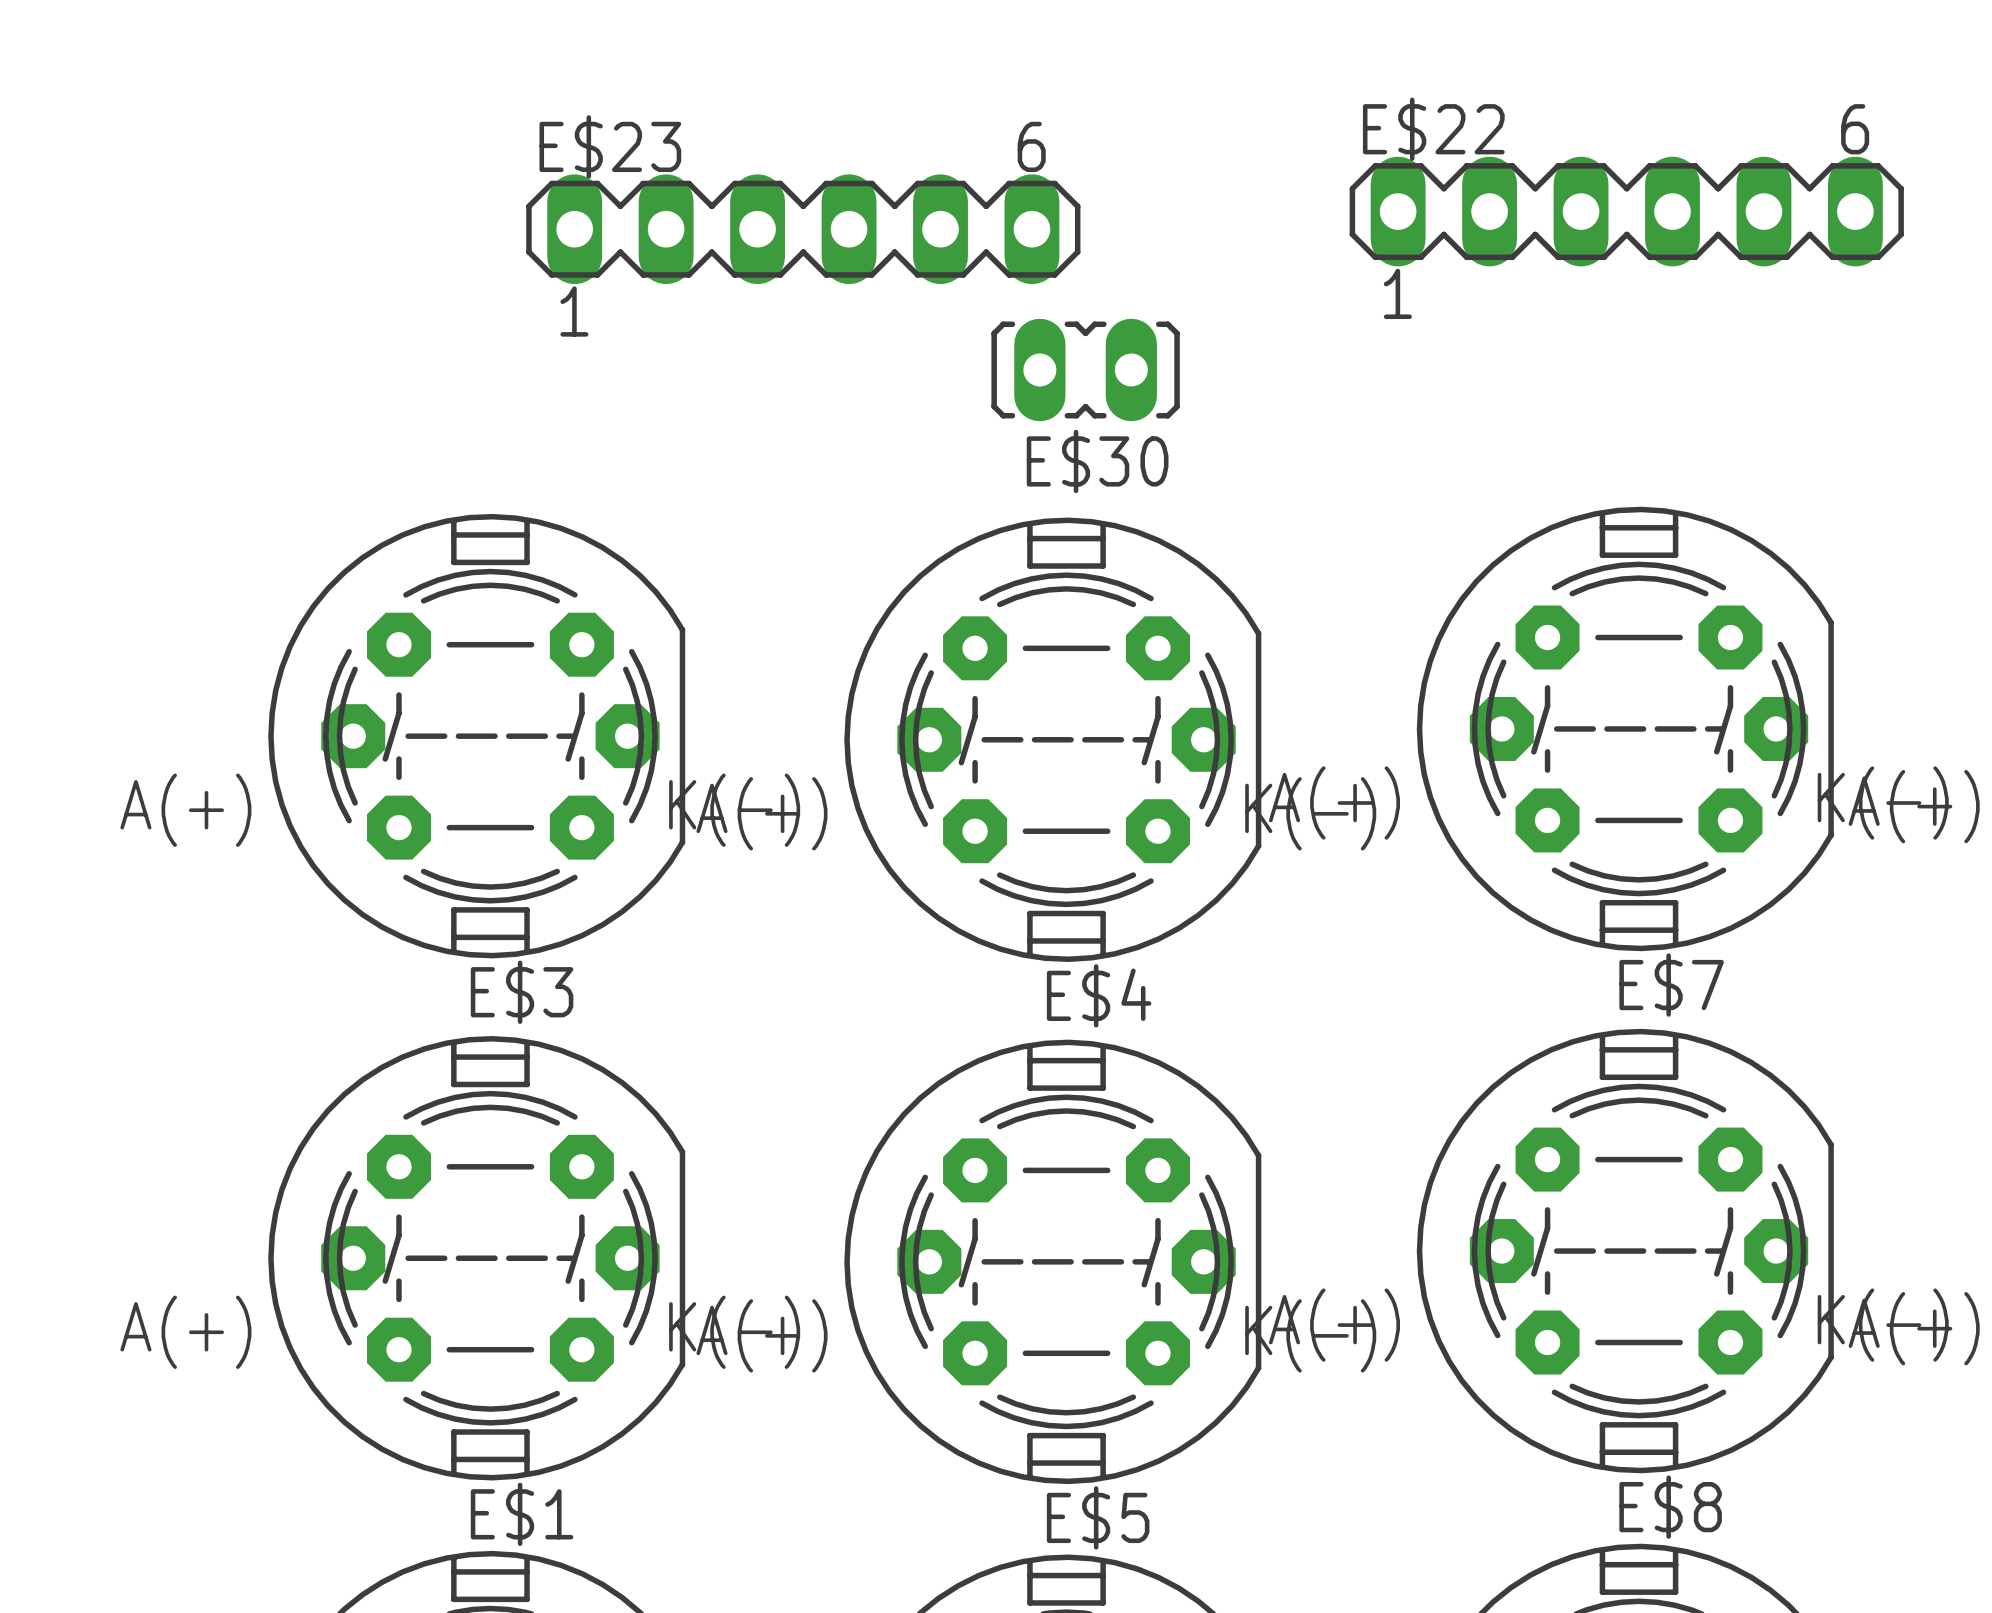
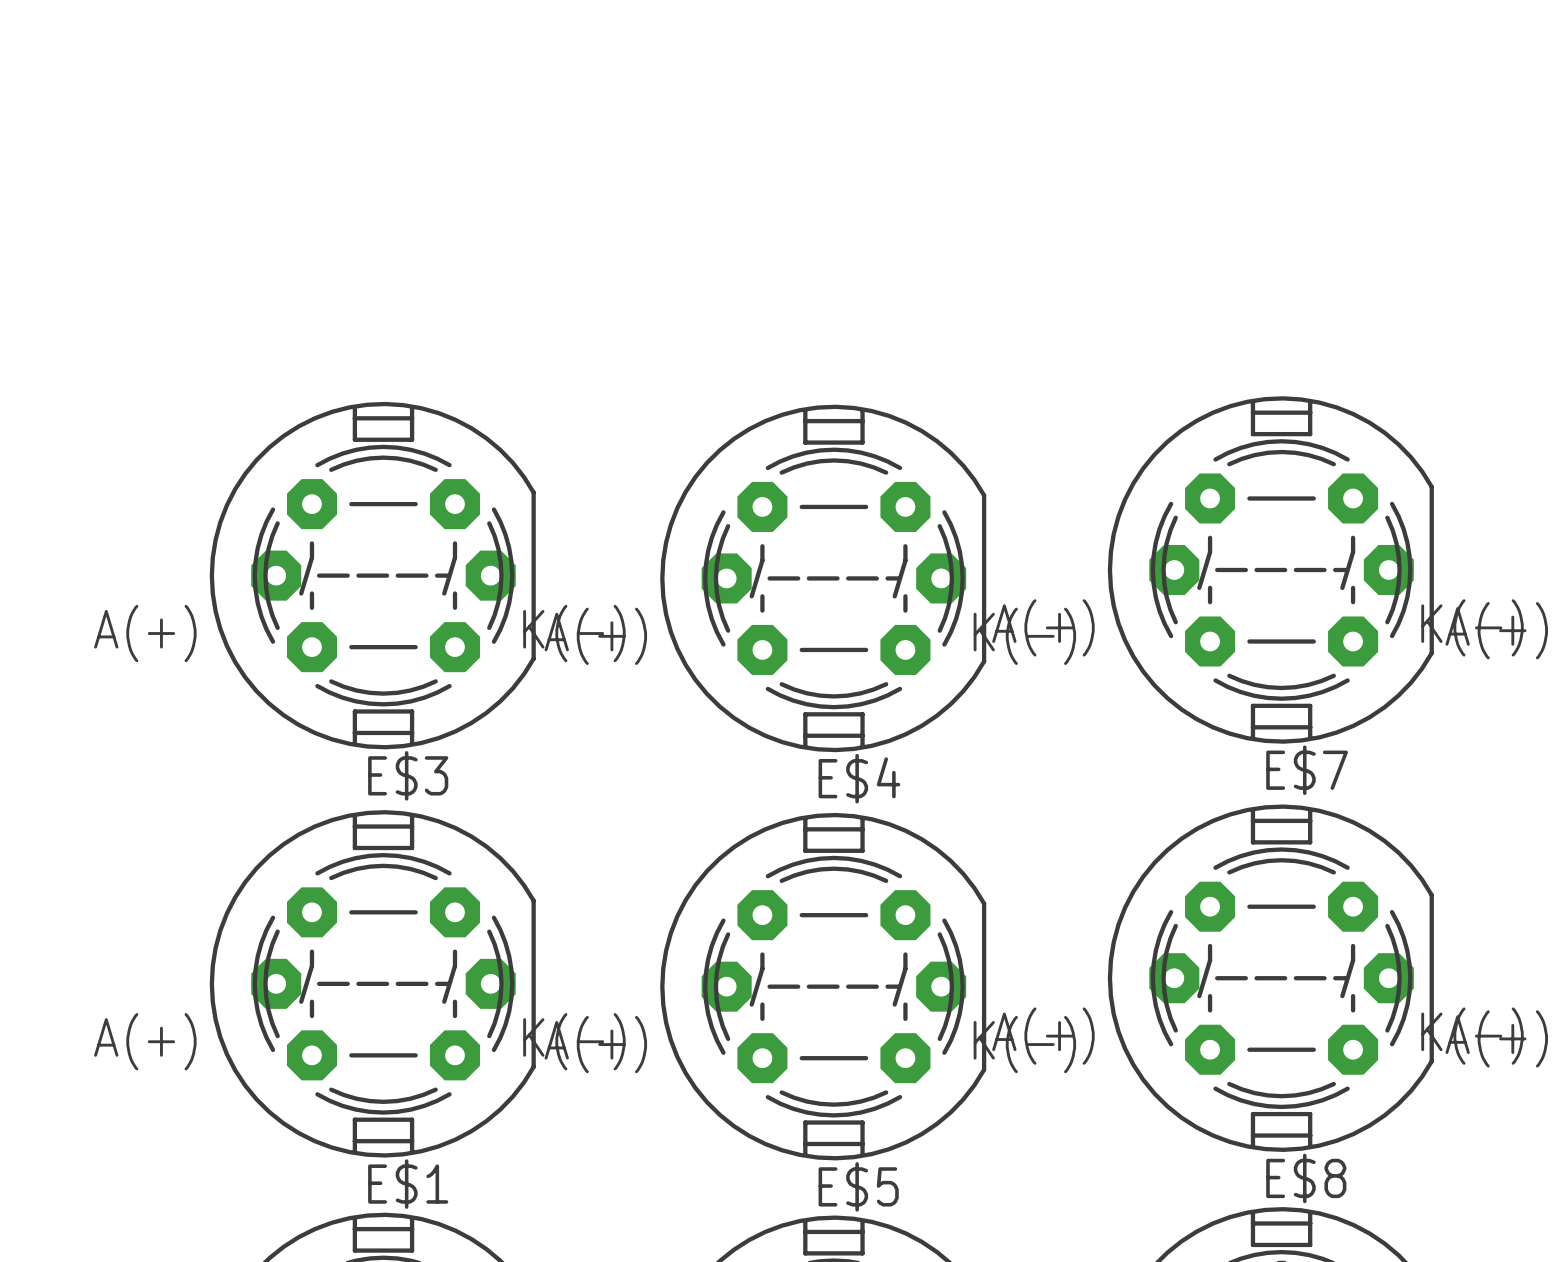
E$22: (1626, 211) -> none
E$23: (803, 229) -> none
E$30: (1085, 369) -> none

